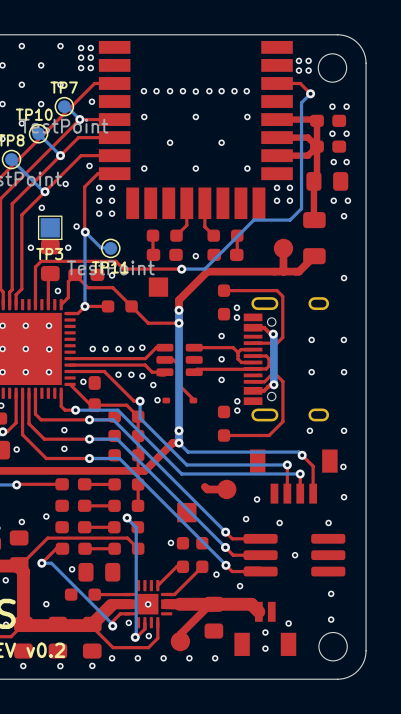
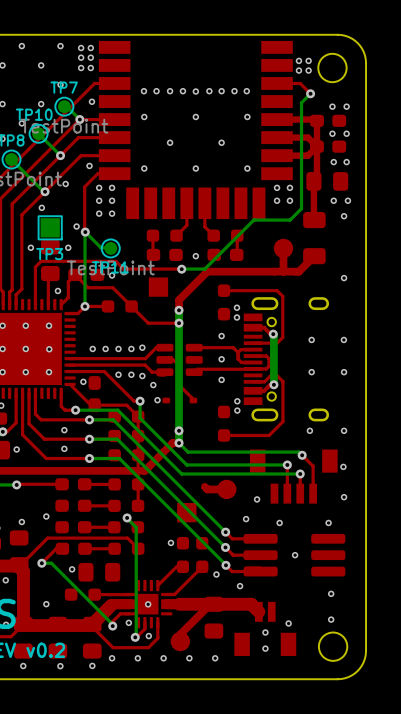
via: (21, 84) -> none

